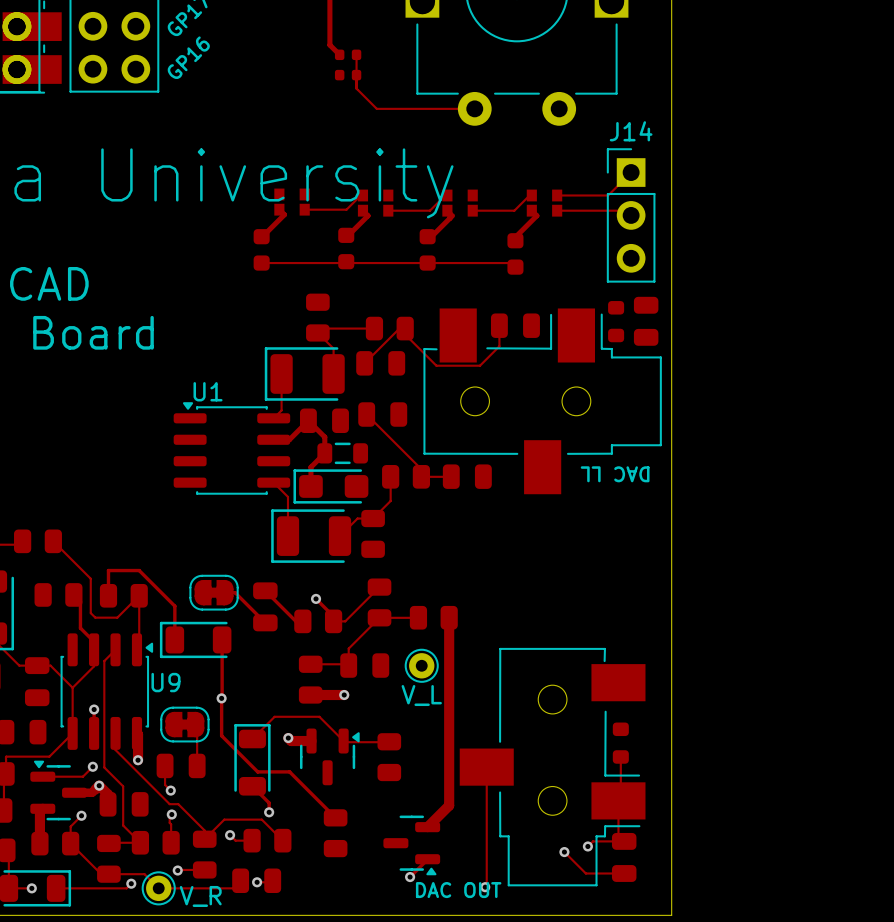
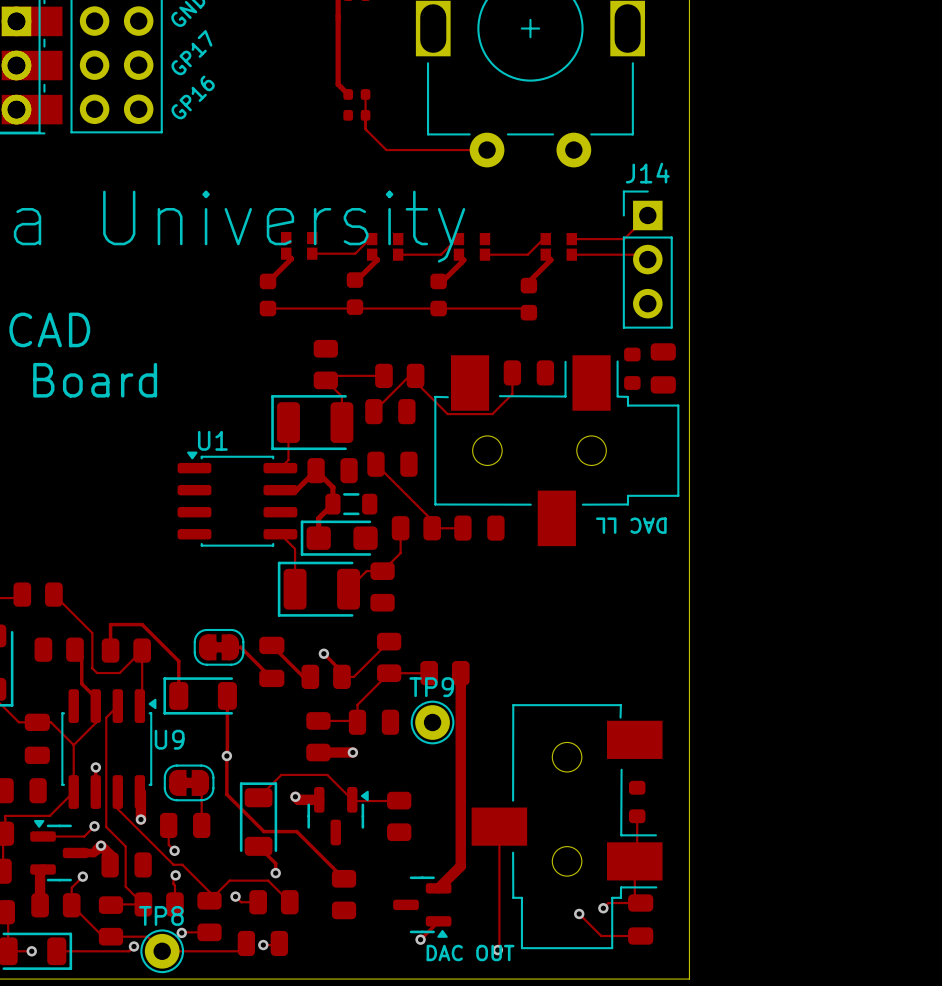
part: V_L (421, 665) -> none
TP9: none -> (432, 722)
part: V_R (158, 888) -> none
TP8: none -> (162, 951)

